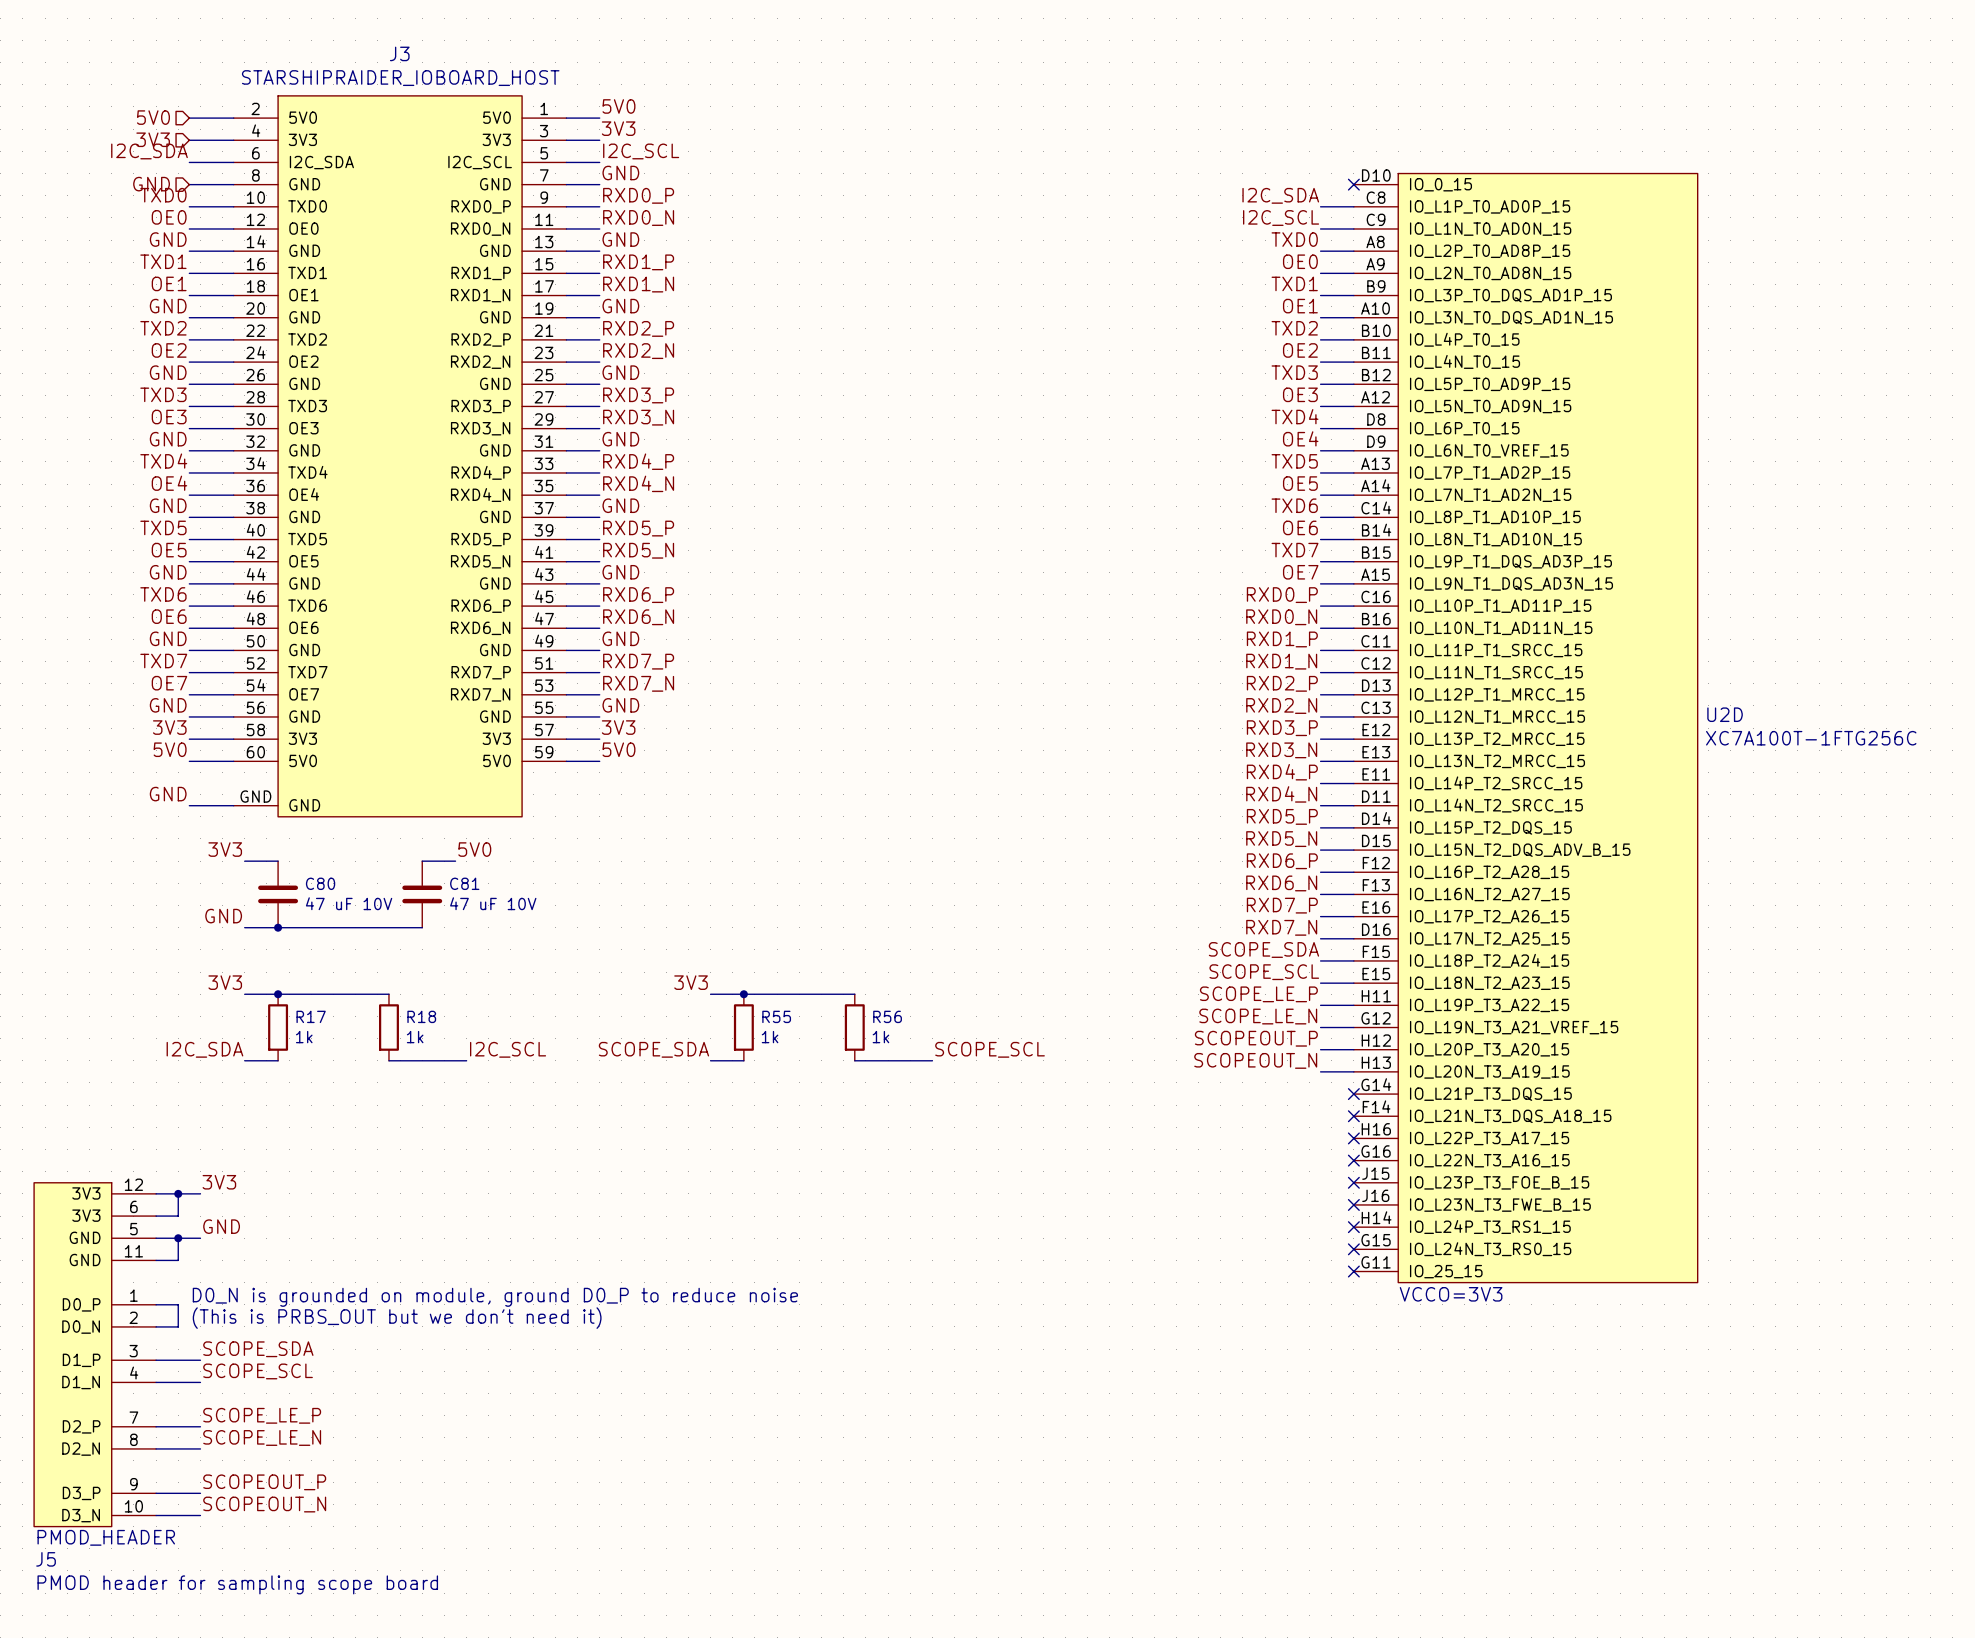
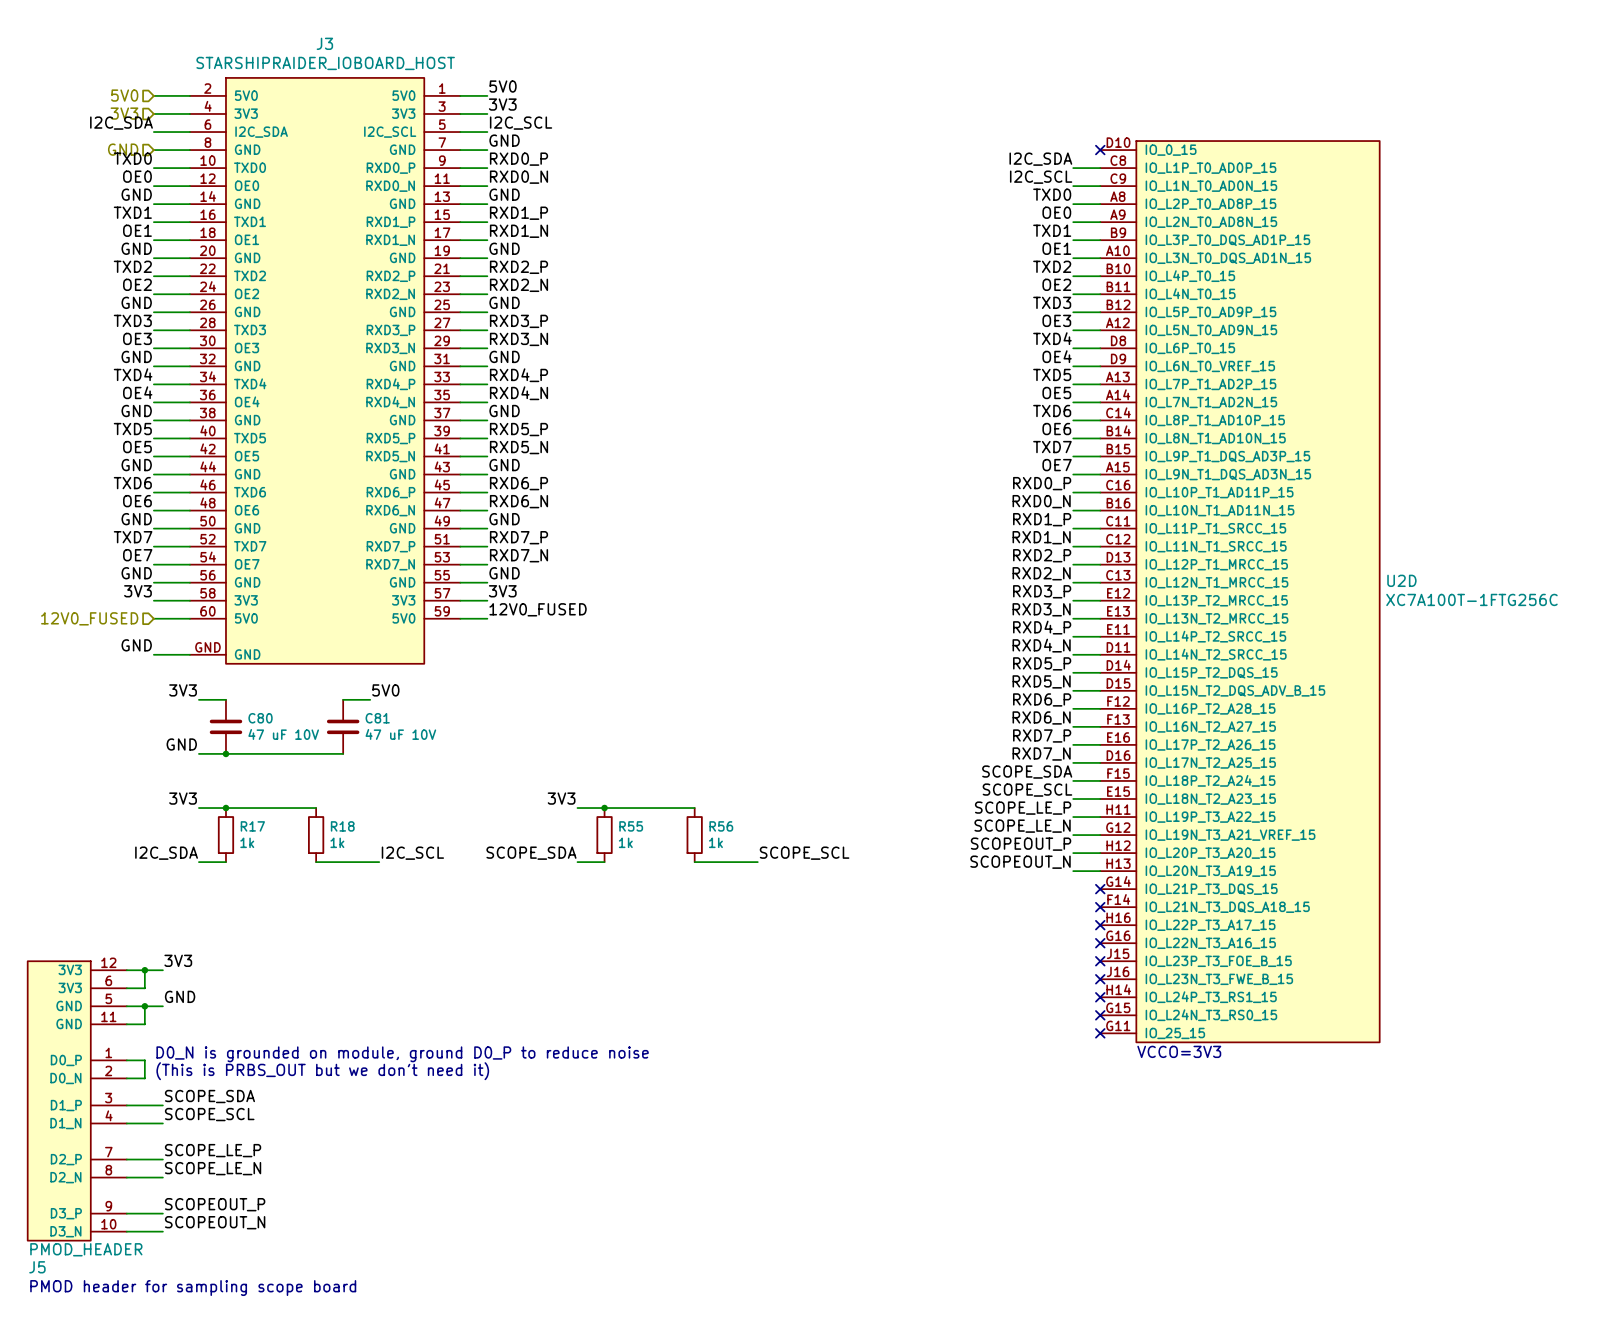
label: 5V0 (170, 749) -> none
label: 5V0 (618, 749) -> 12V0_FUSED (538, 609)
hierarchical label: none -> 12V0_FUSED (89, 618)

